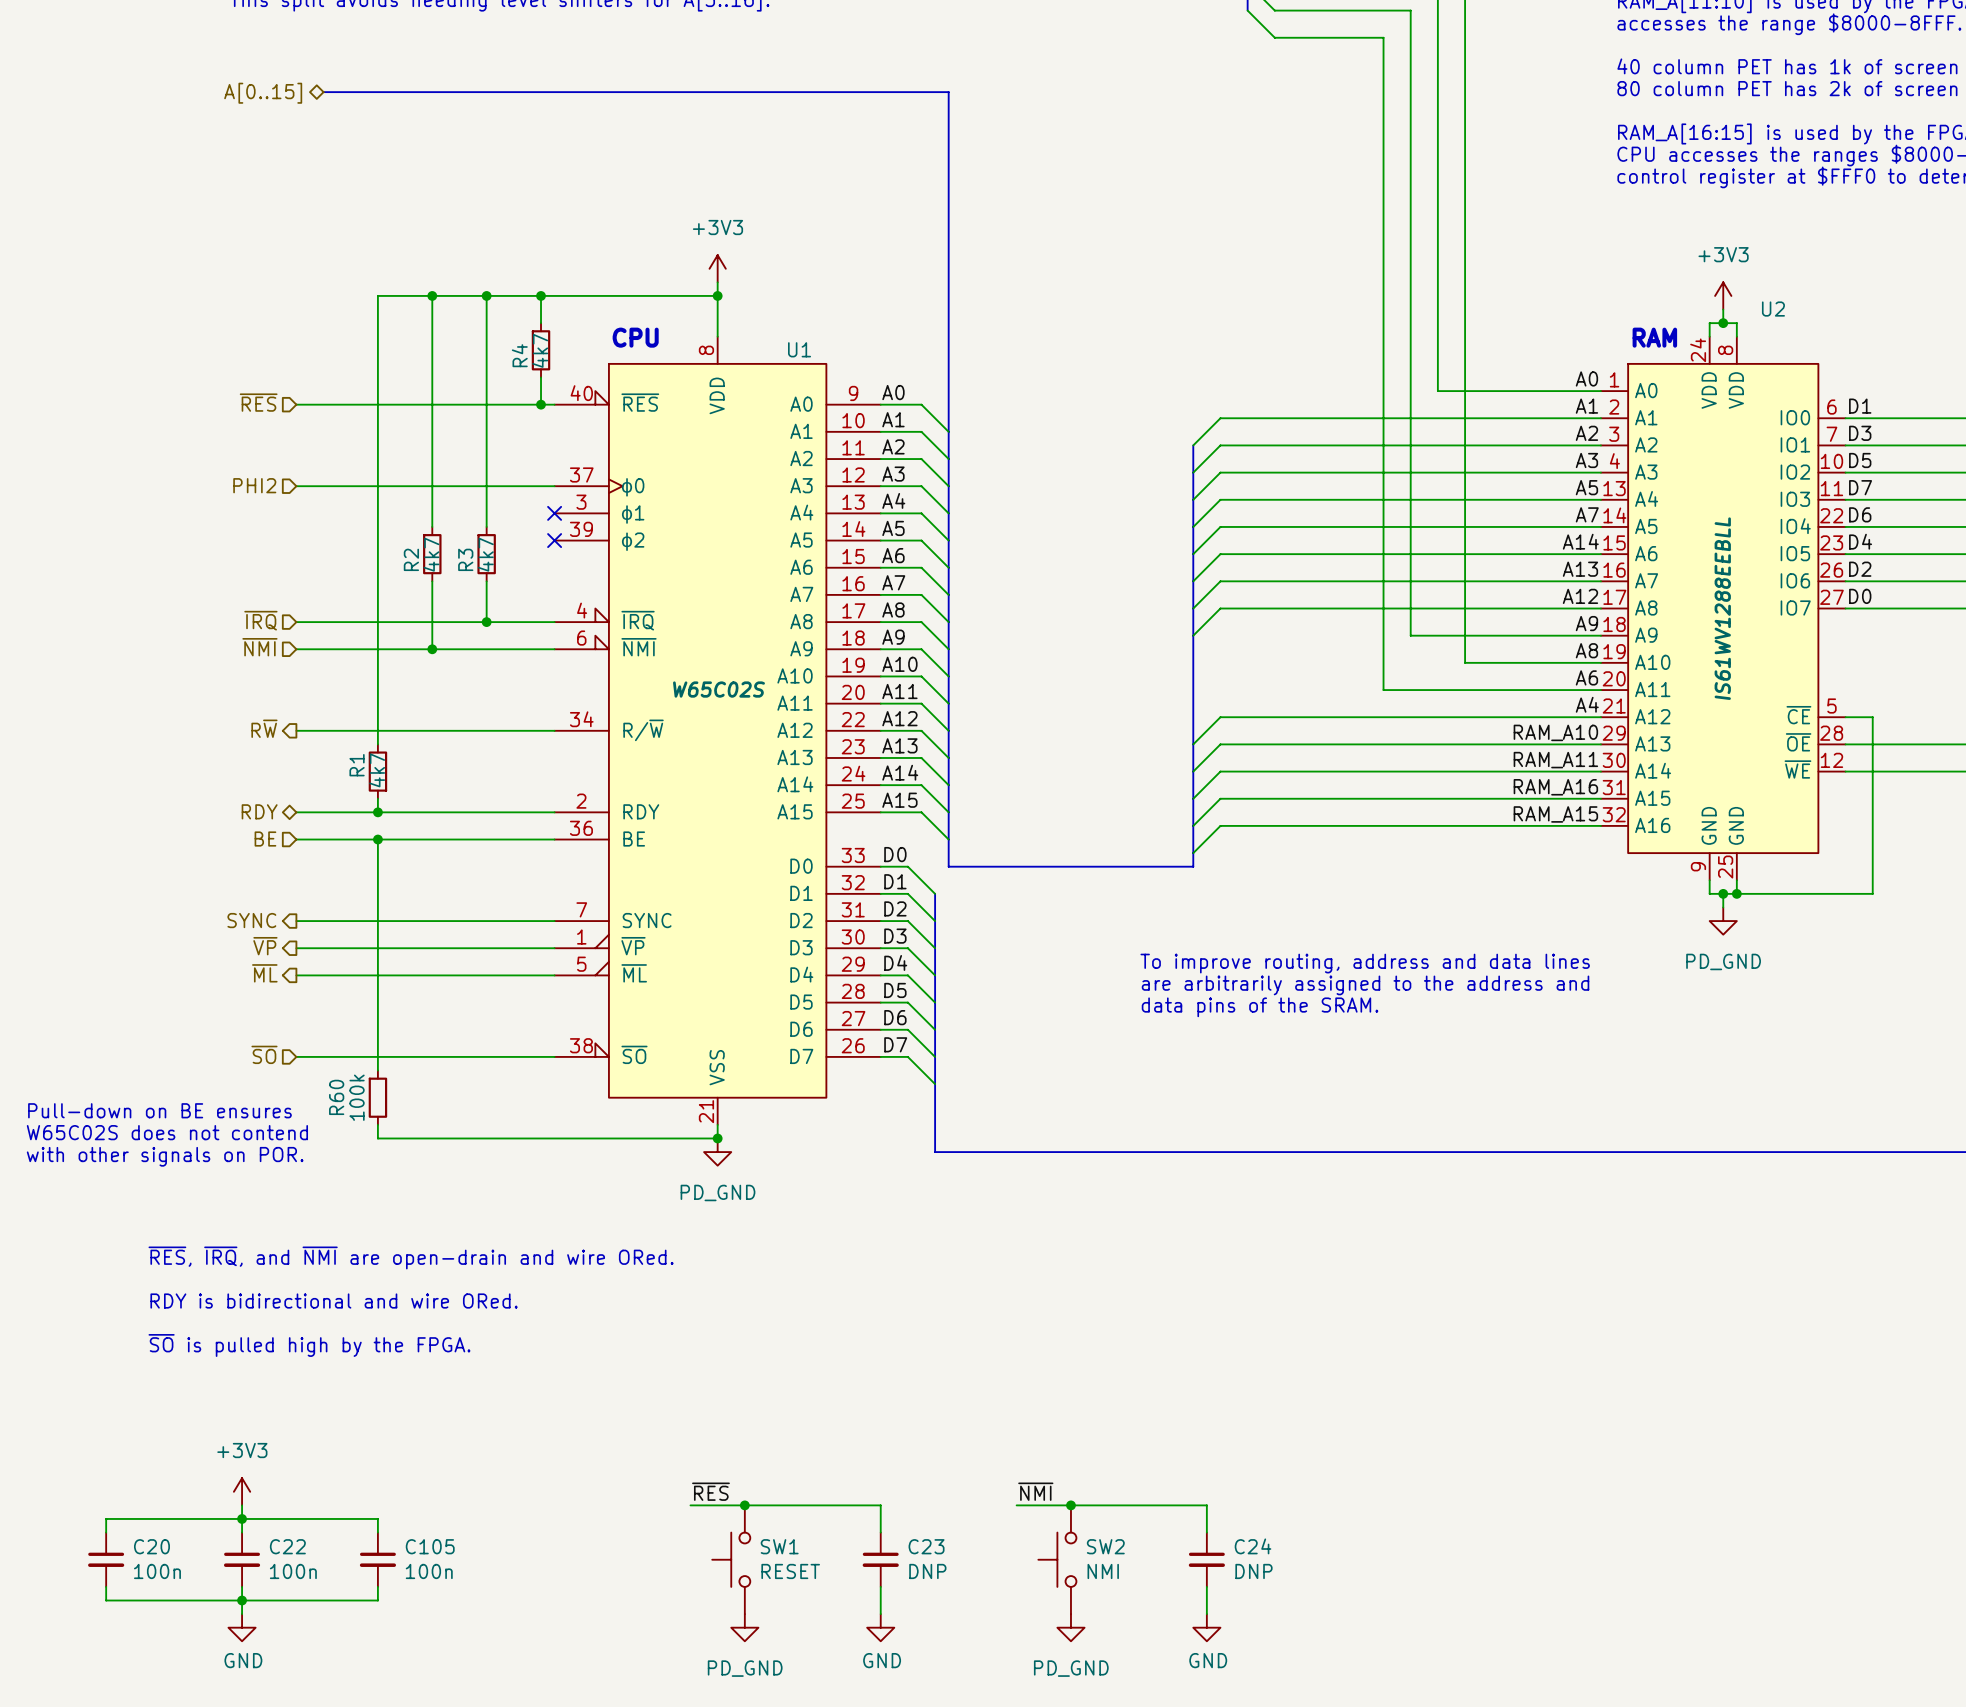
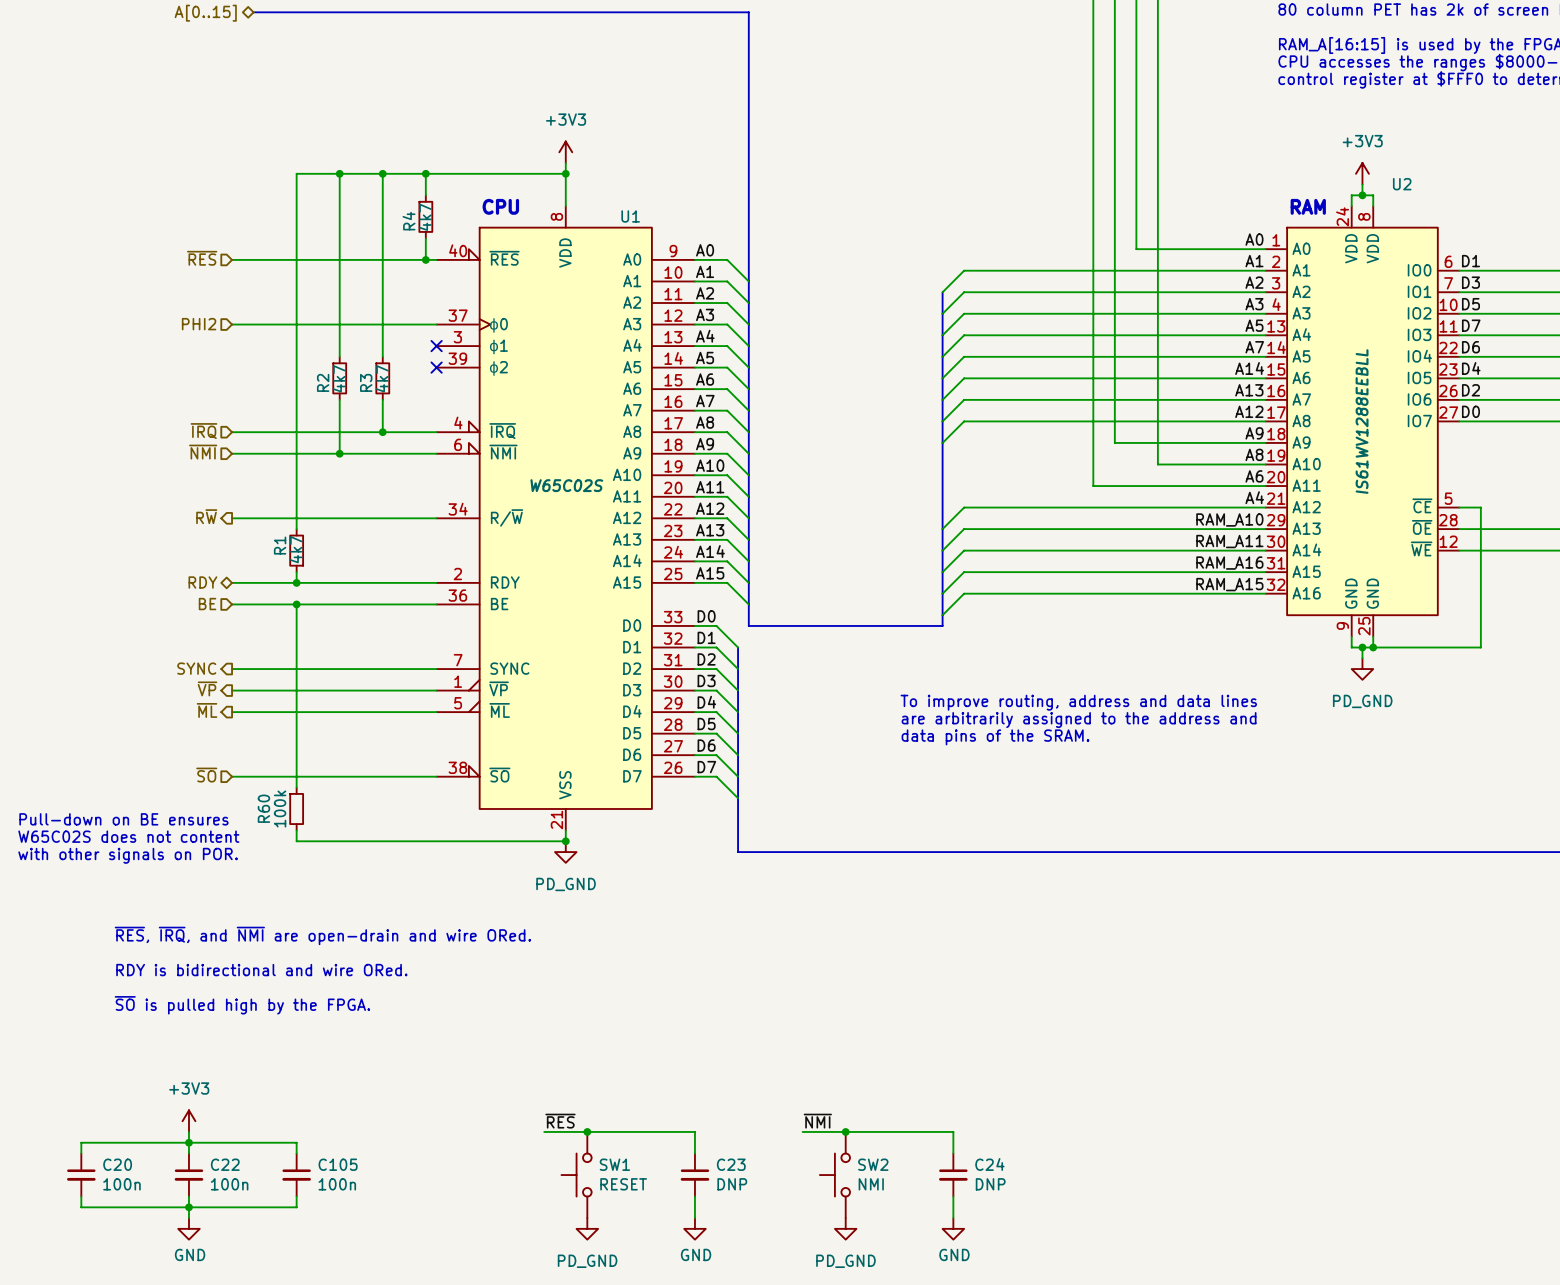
text: W65C02S does not contend (167, 1132) -> W65C02S does not content (128, 836)

